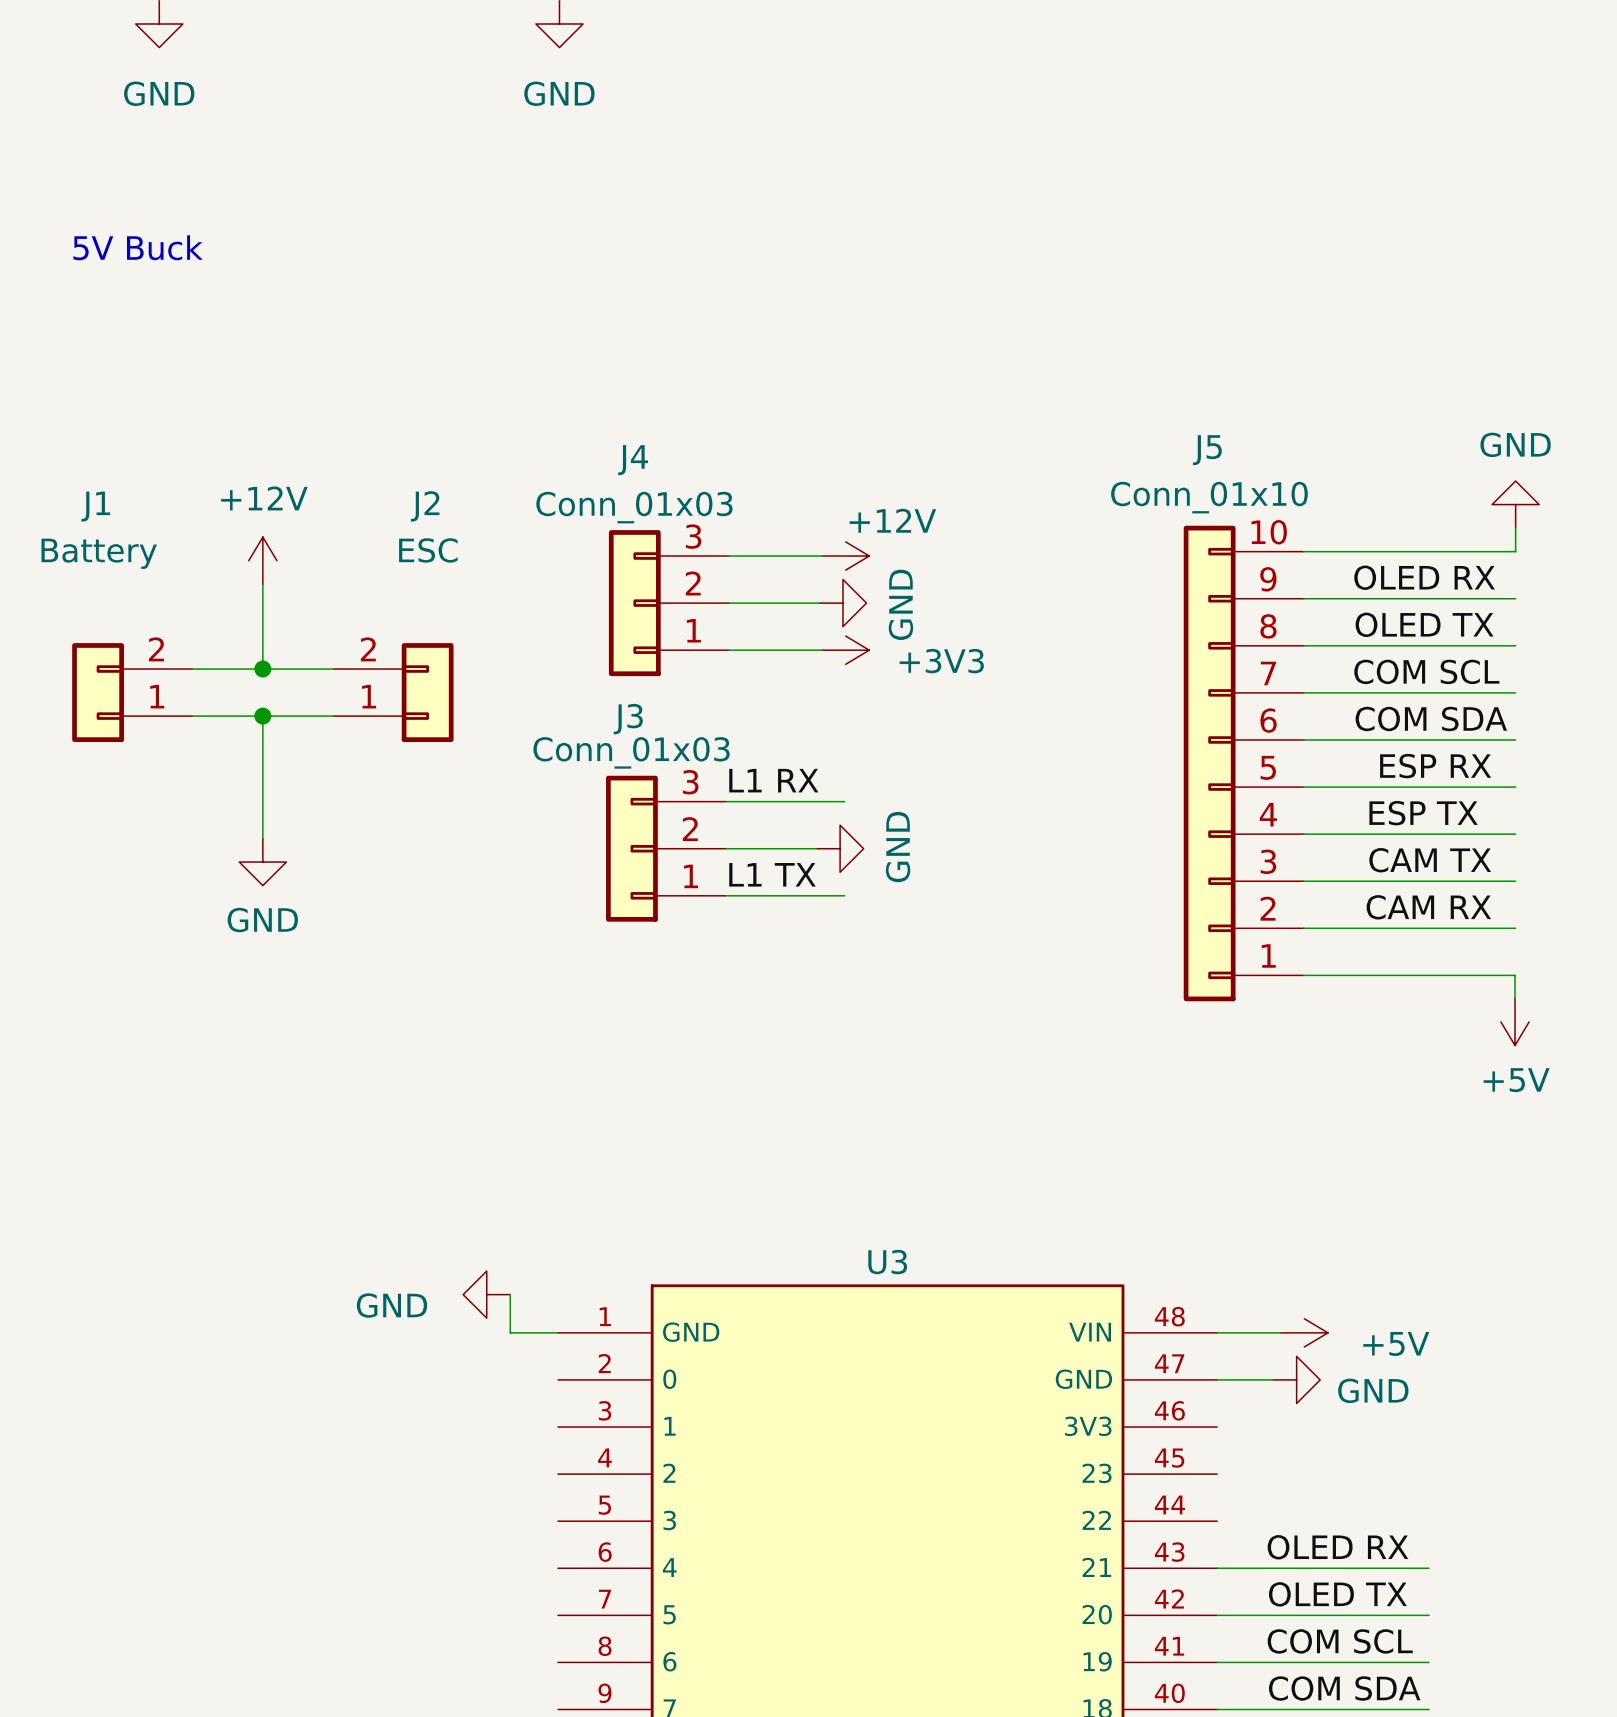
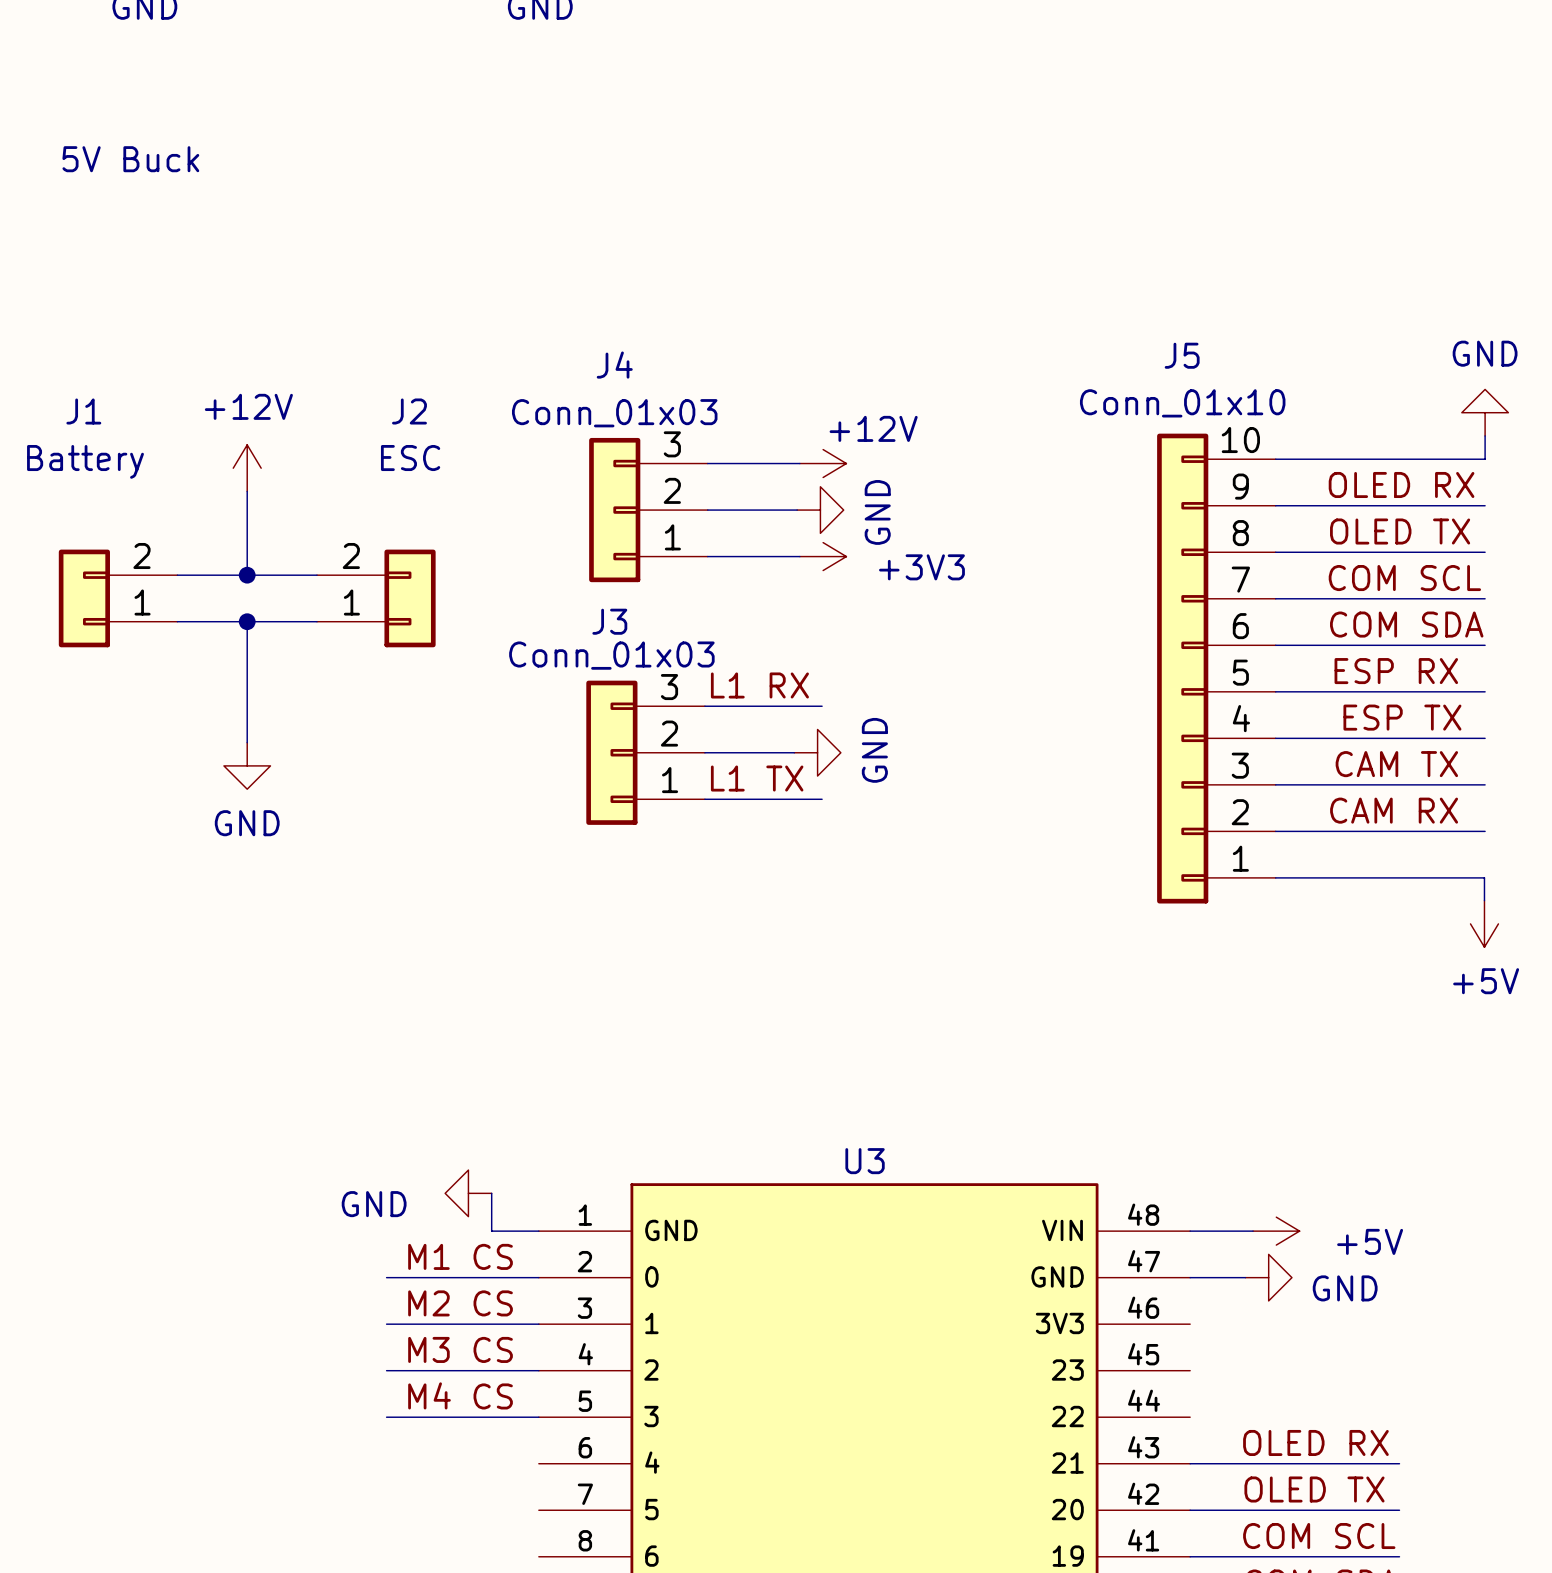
label: none -> M1 CS (460, 1256)
wire: none -> (386, 1277) (538, 1277)
label: none -> M2 CS (460, 1303)
wire: none -> (386, 1324) (538, 1324)
label: none -> M3 CS (460, 1349)
wire: none -> (386, 1370) (538, 1370)
label: none -> M4 CS (460, 1395)
wire: none -> (386, 1417) (538, 1417)

